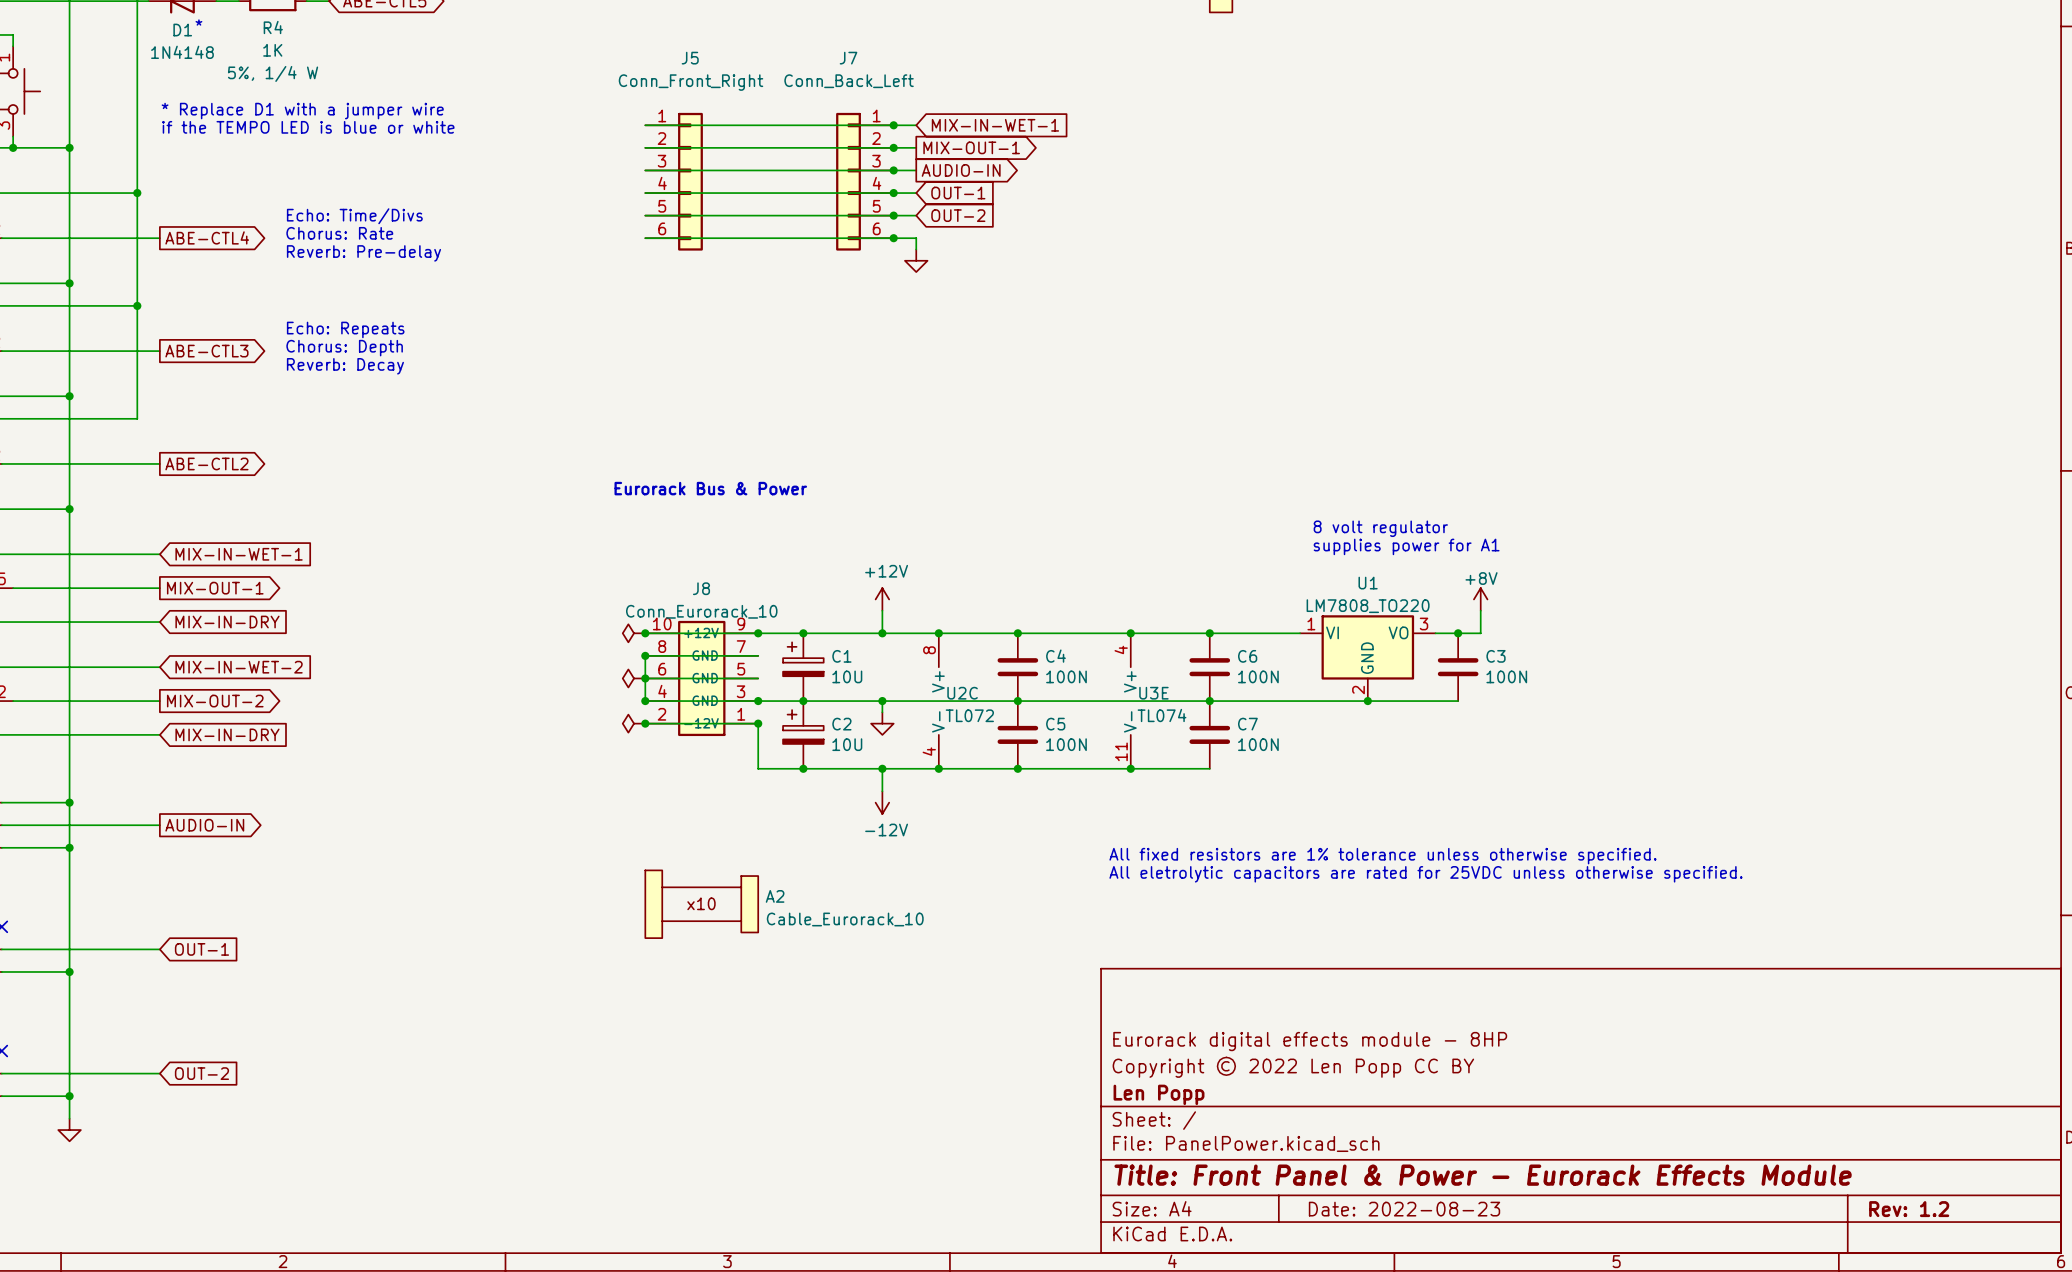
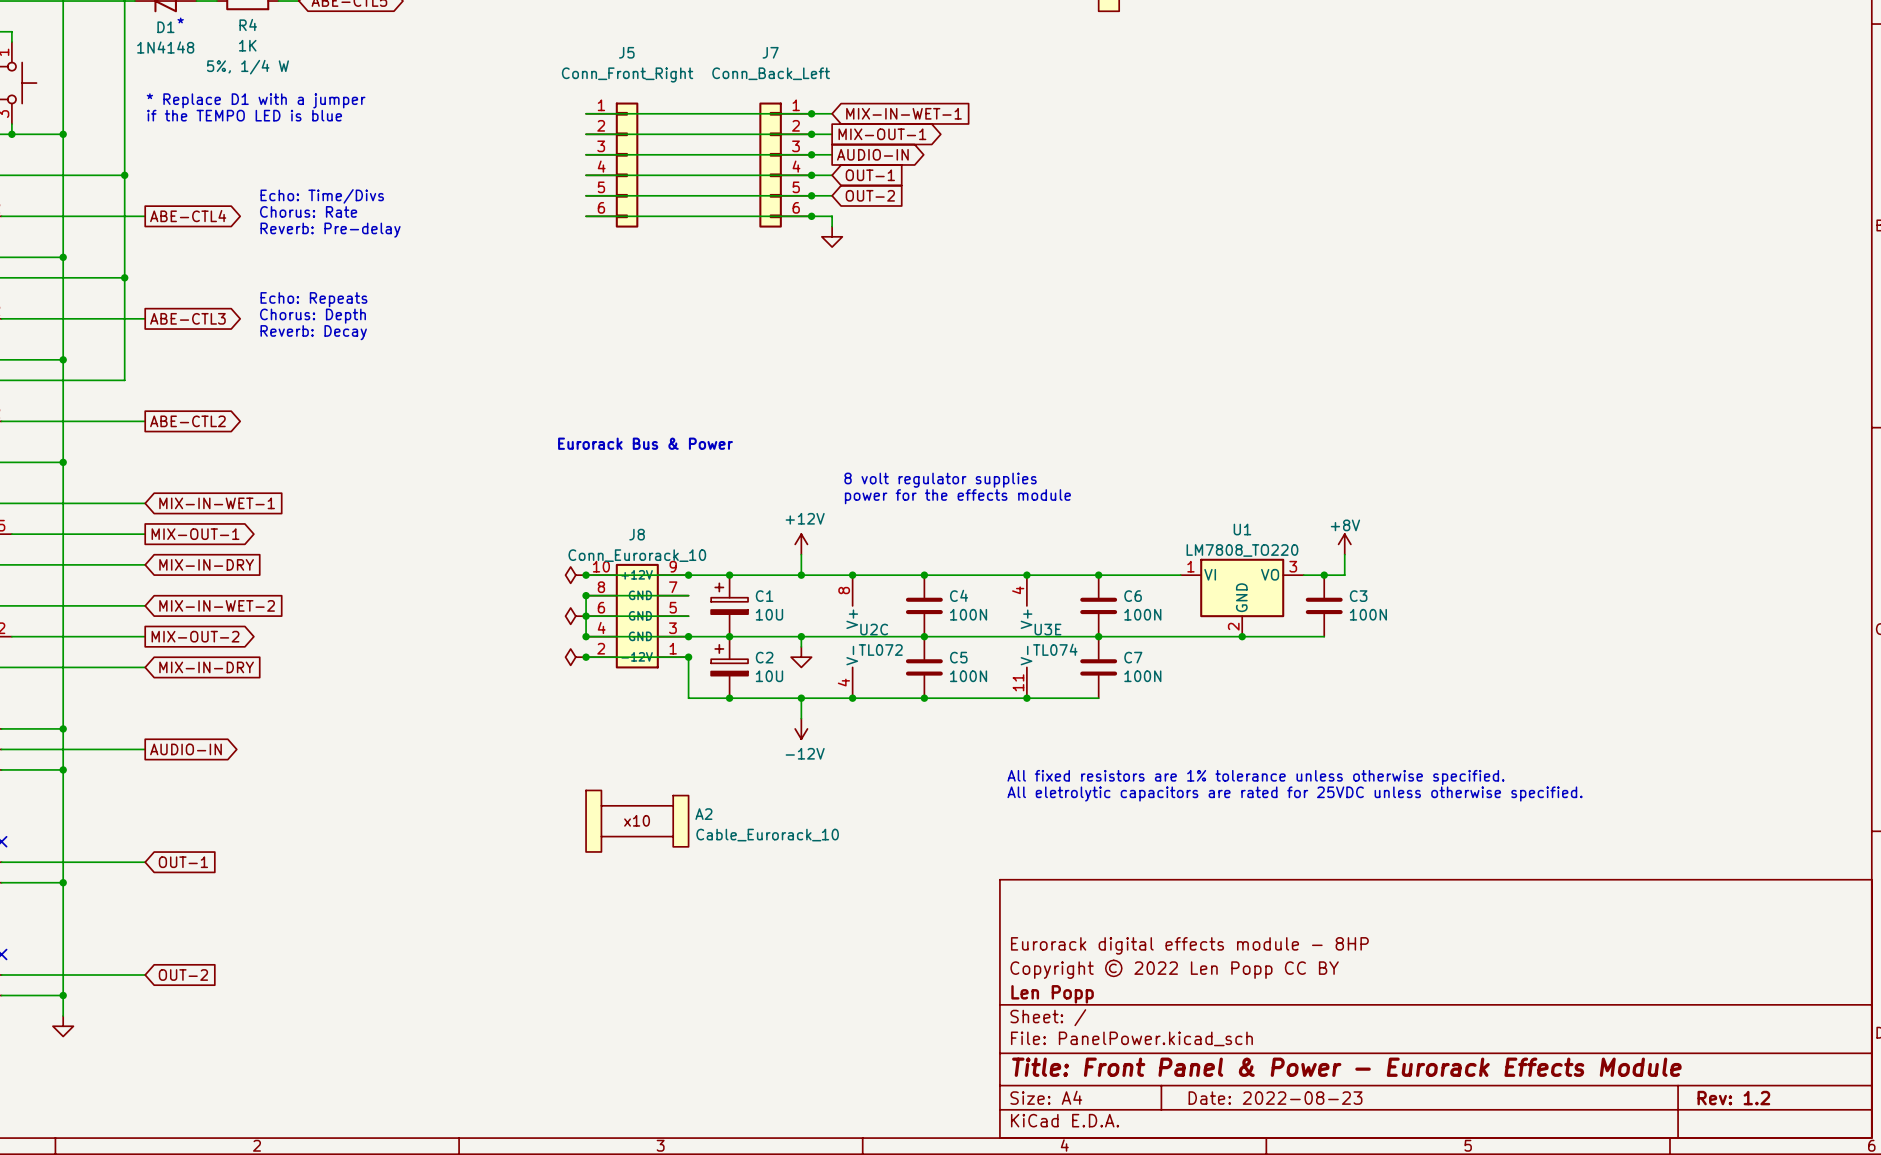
text: * Replace D1 with a jumper wire (302, 111) -> * Replace D1 with a jumper (256, 100)
text: if the TEMPO LED is blue or white (308, 127) -> if the TEMPO LED is blue (244, 115)
text: none -> 8 volt regulator supplies (940, 480)
text: 8 volt regulator (1380, 528) -> none
text: none -> power for the effects module (957, 496)
text: supplies power for A1 (1406, 546) -> none

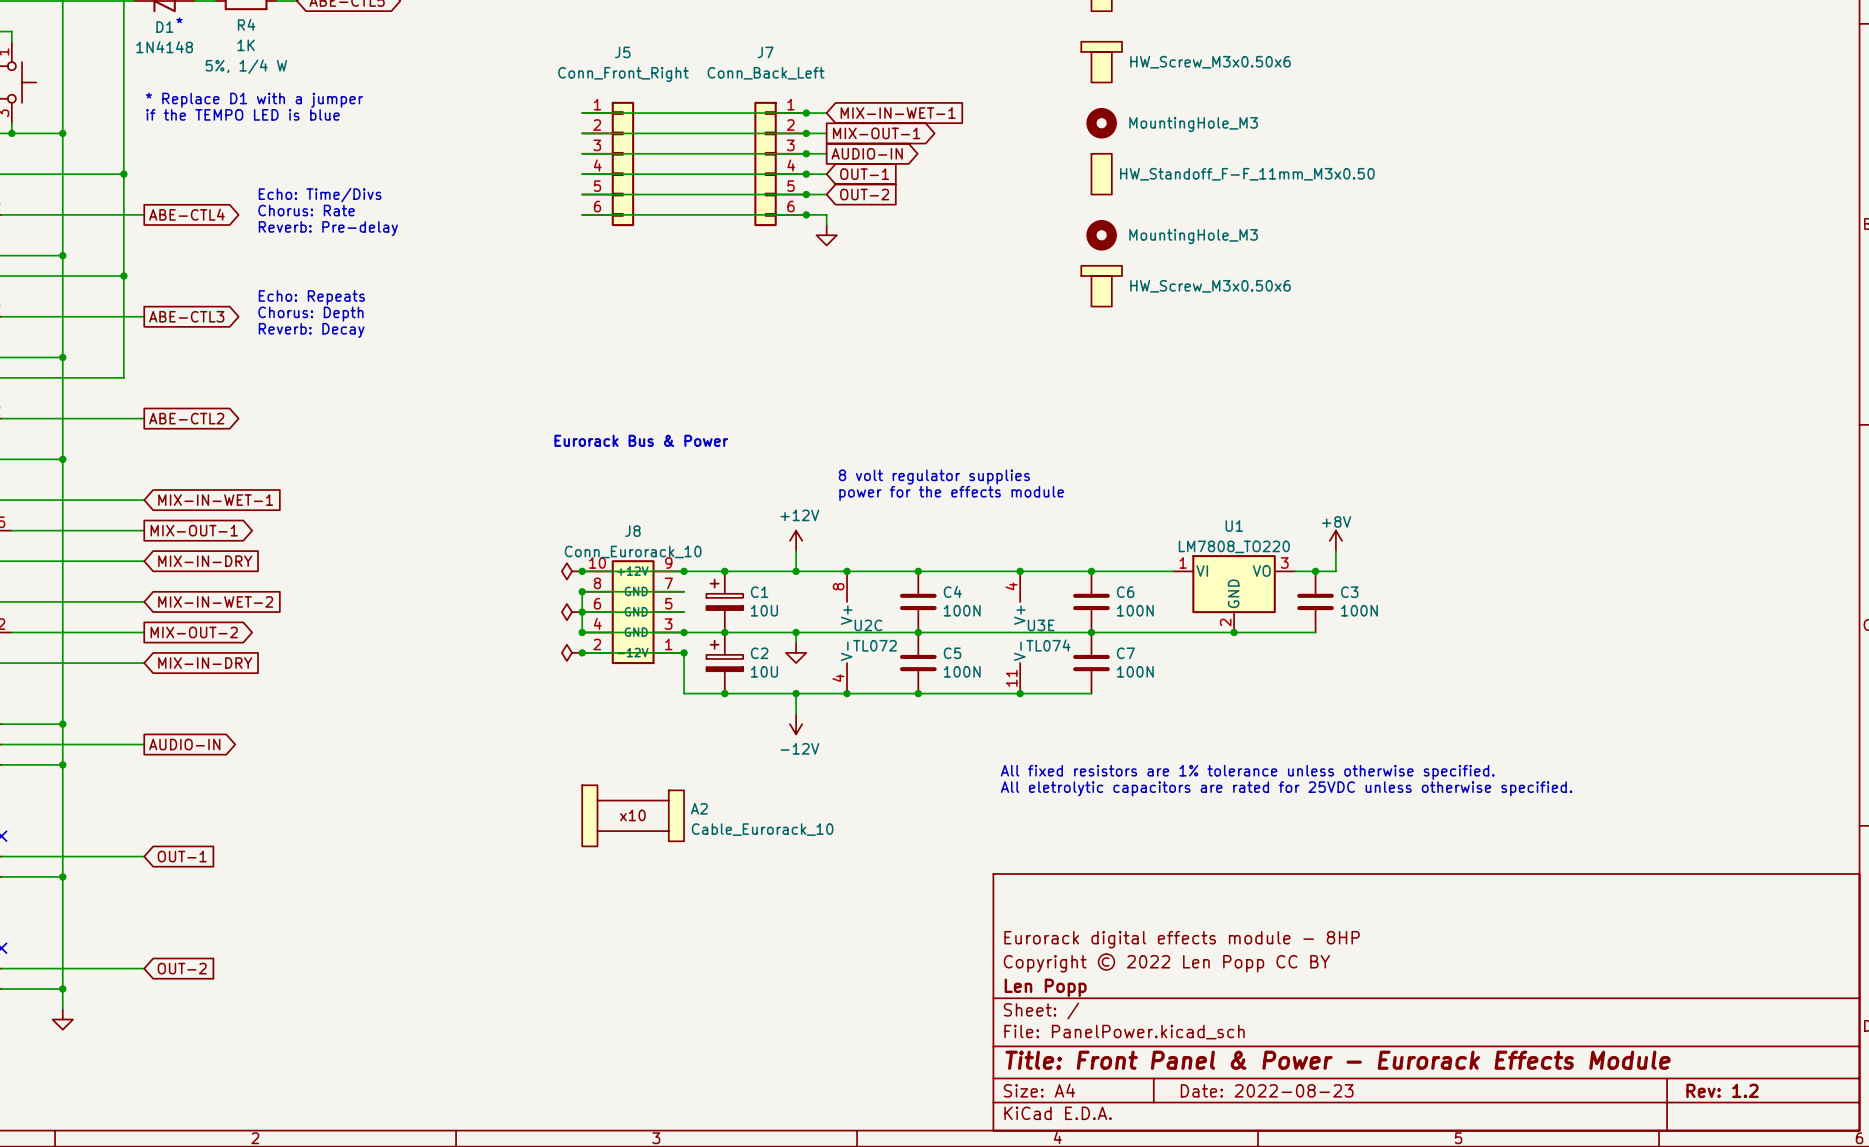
part: none -> HW_Screw_M3x0.50x6 (1101, 62)
part: none -> MountingHole_M3 (1101, 123)
part: none -> HW_Standoff_F-F_11mm_M3x0.50 (1101, 174)
part: none -> MountingHole_M3 (1101, 235)
part: none -> HW_Screw_M3x0.50x6 (1101, 286)

